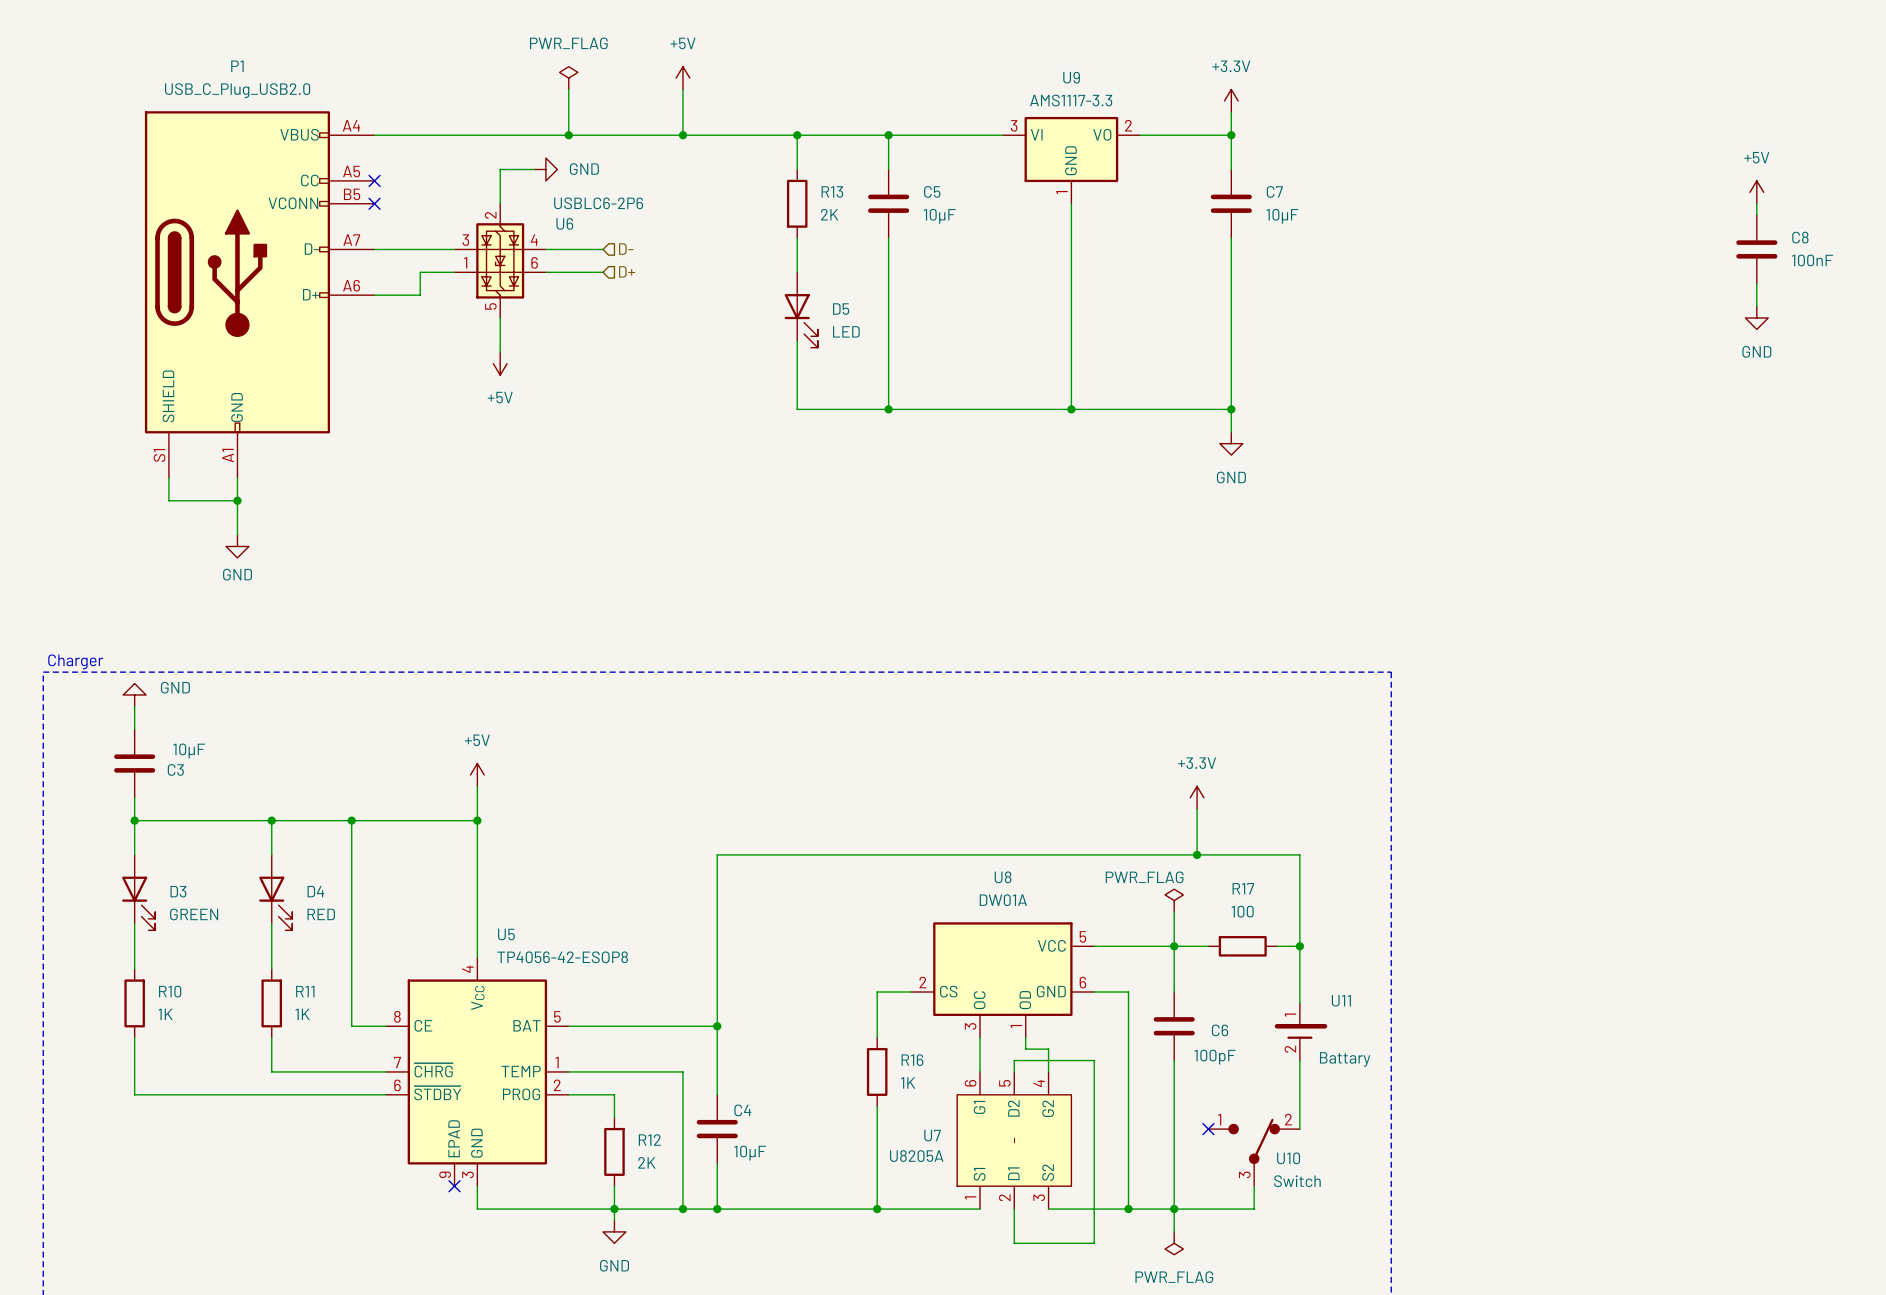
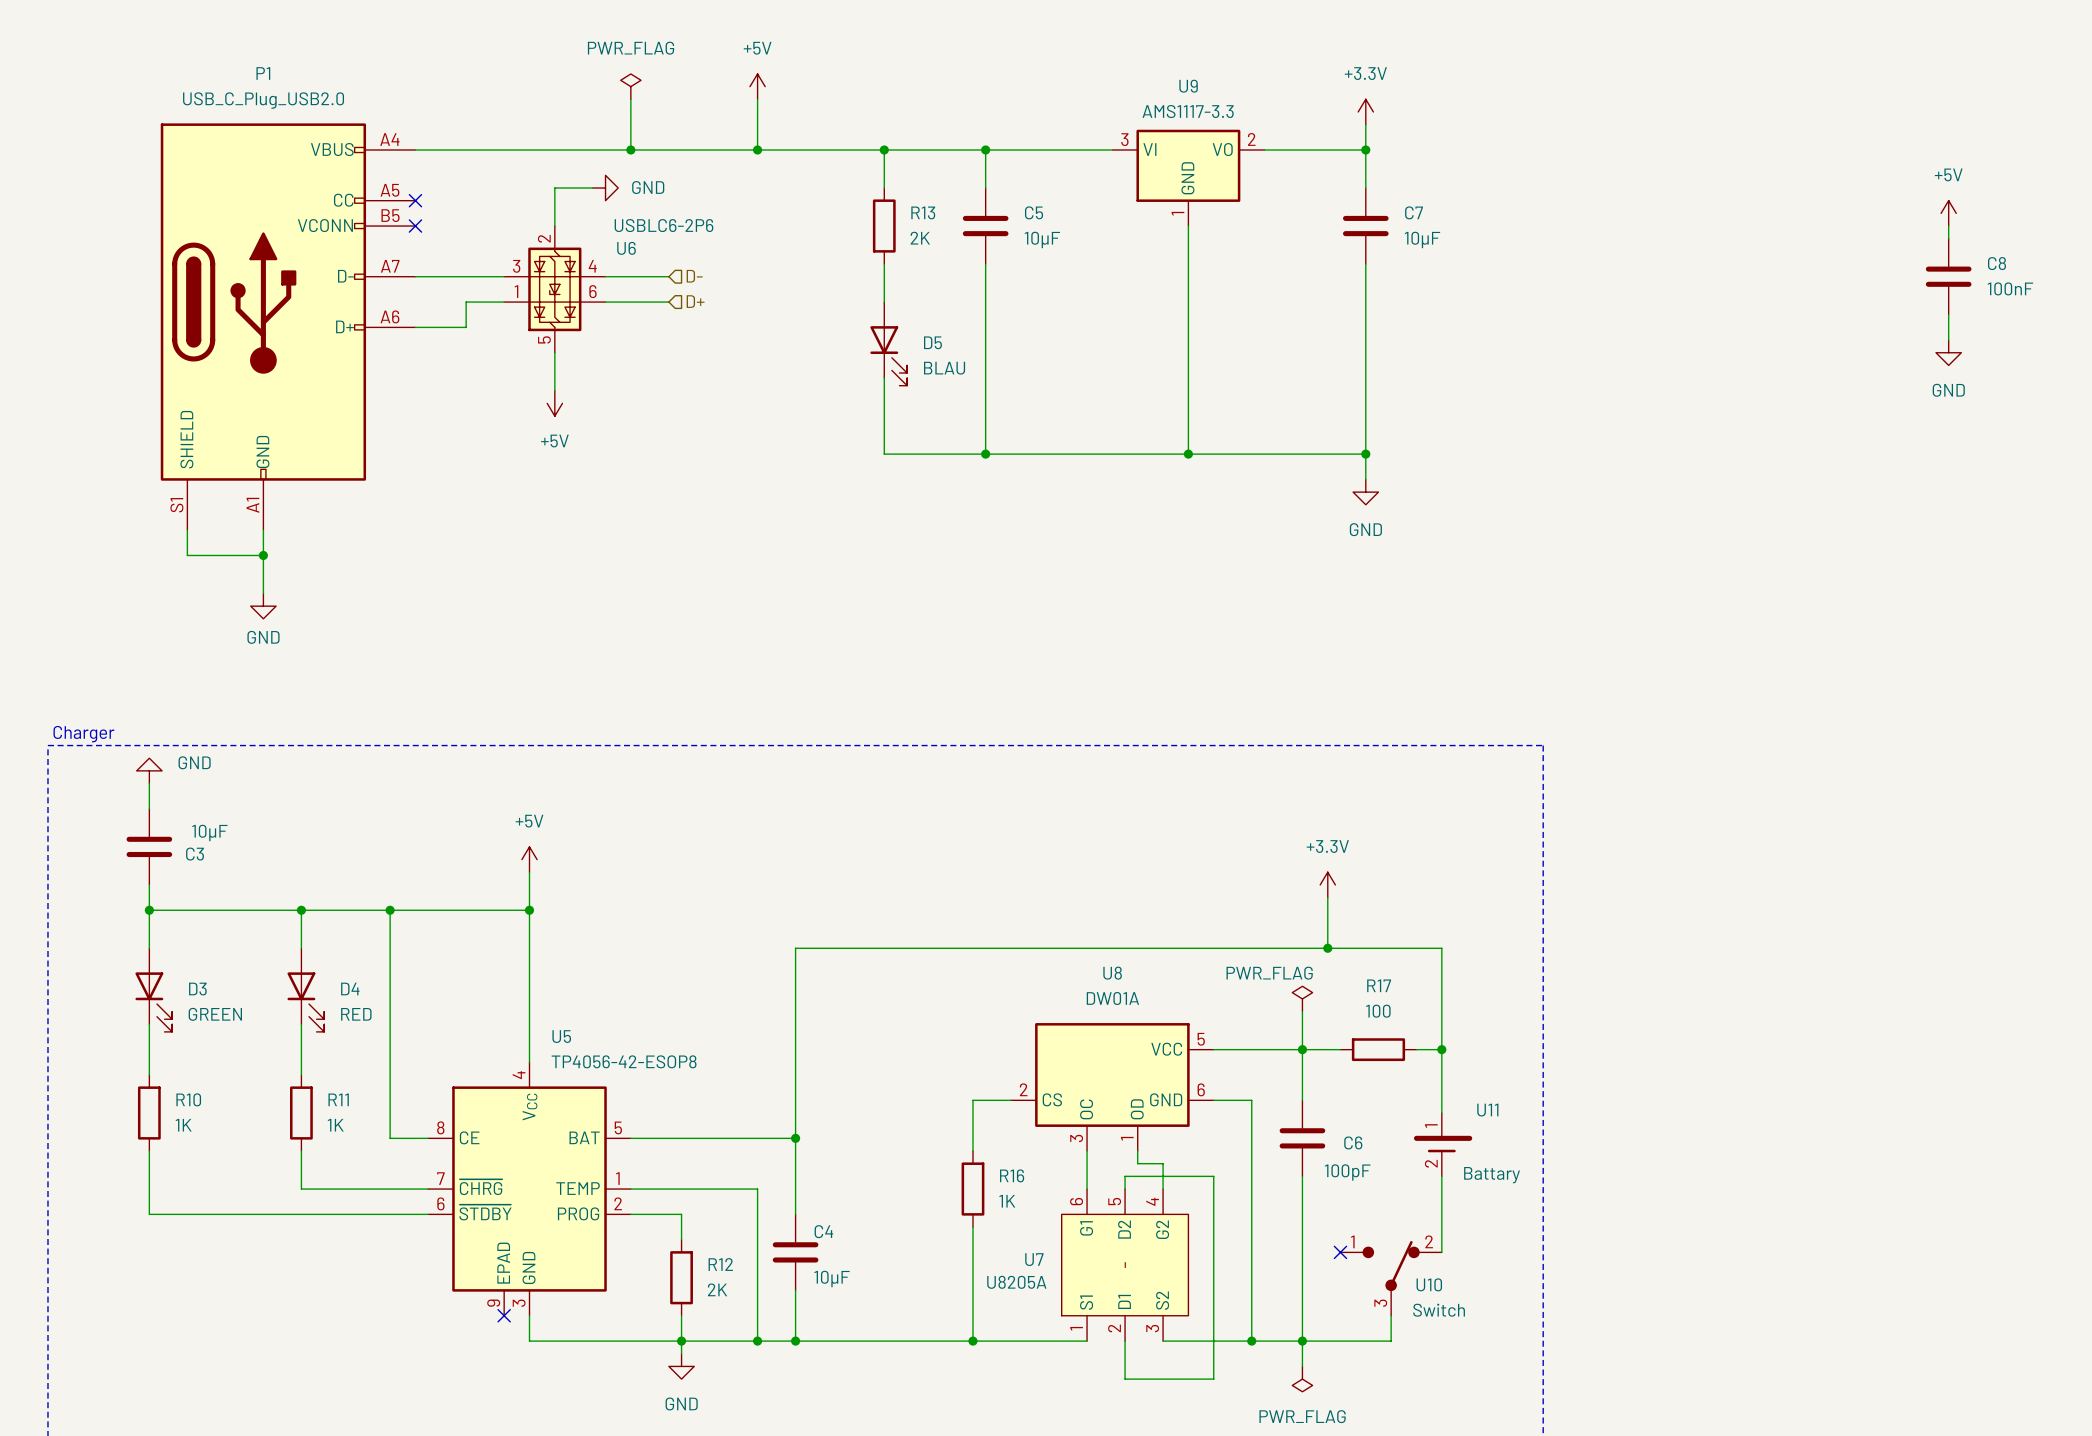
D5 value: LED (846, 331) -> BLAU (944, 368)

